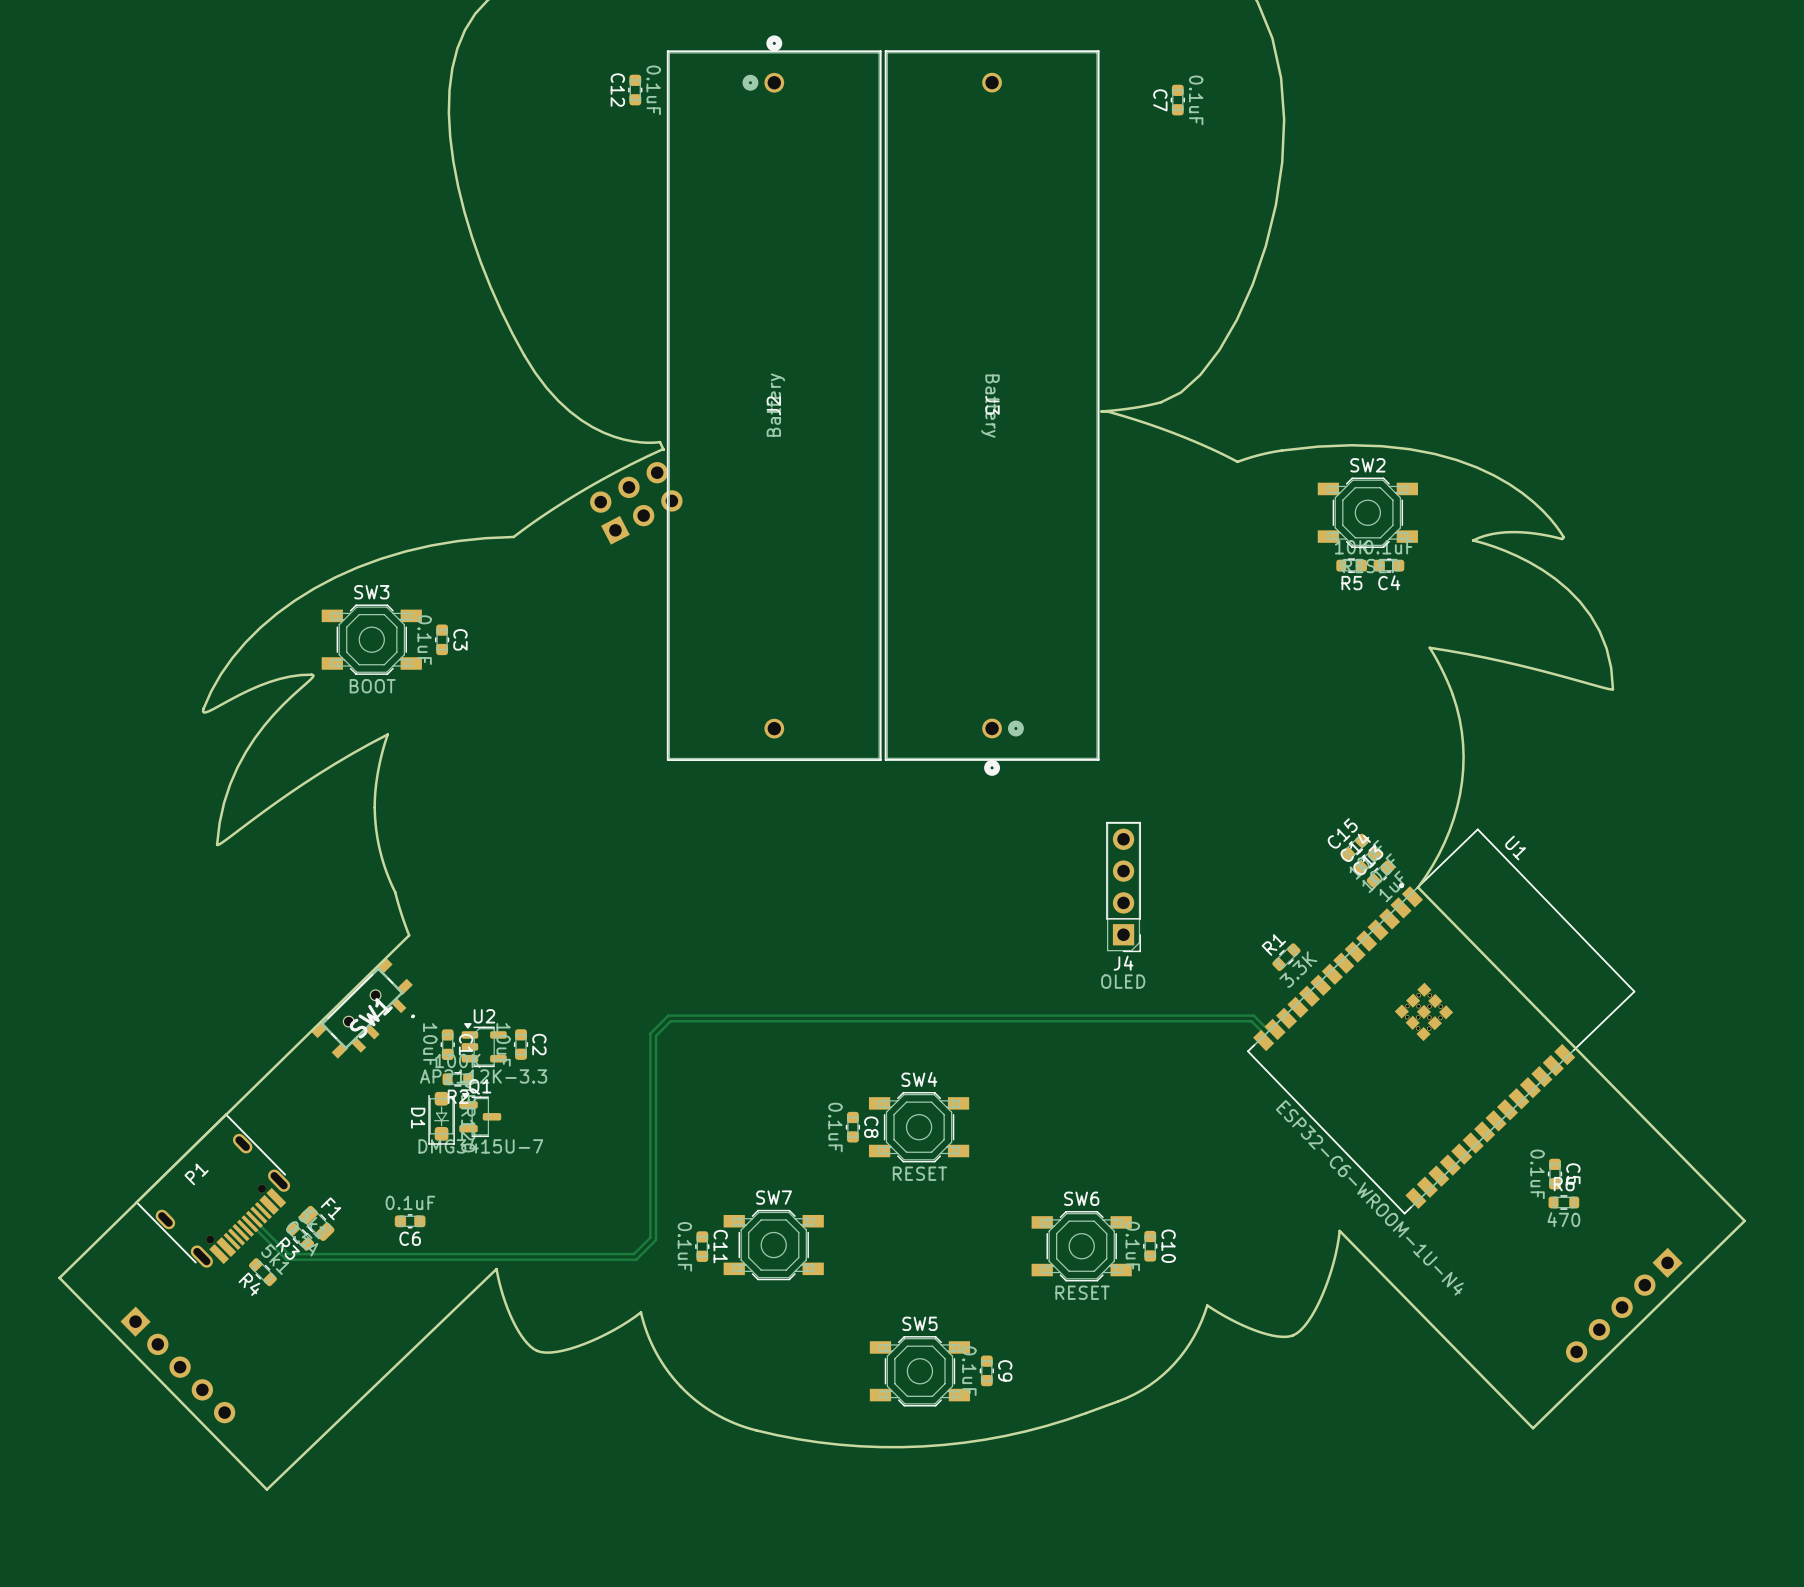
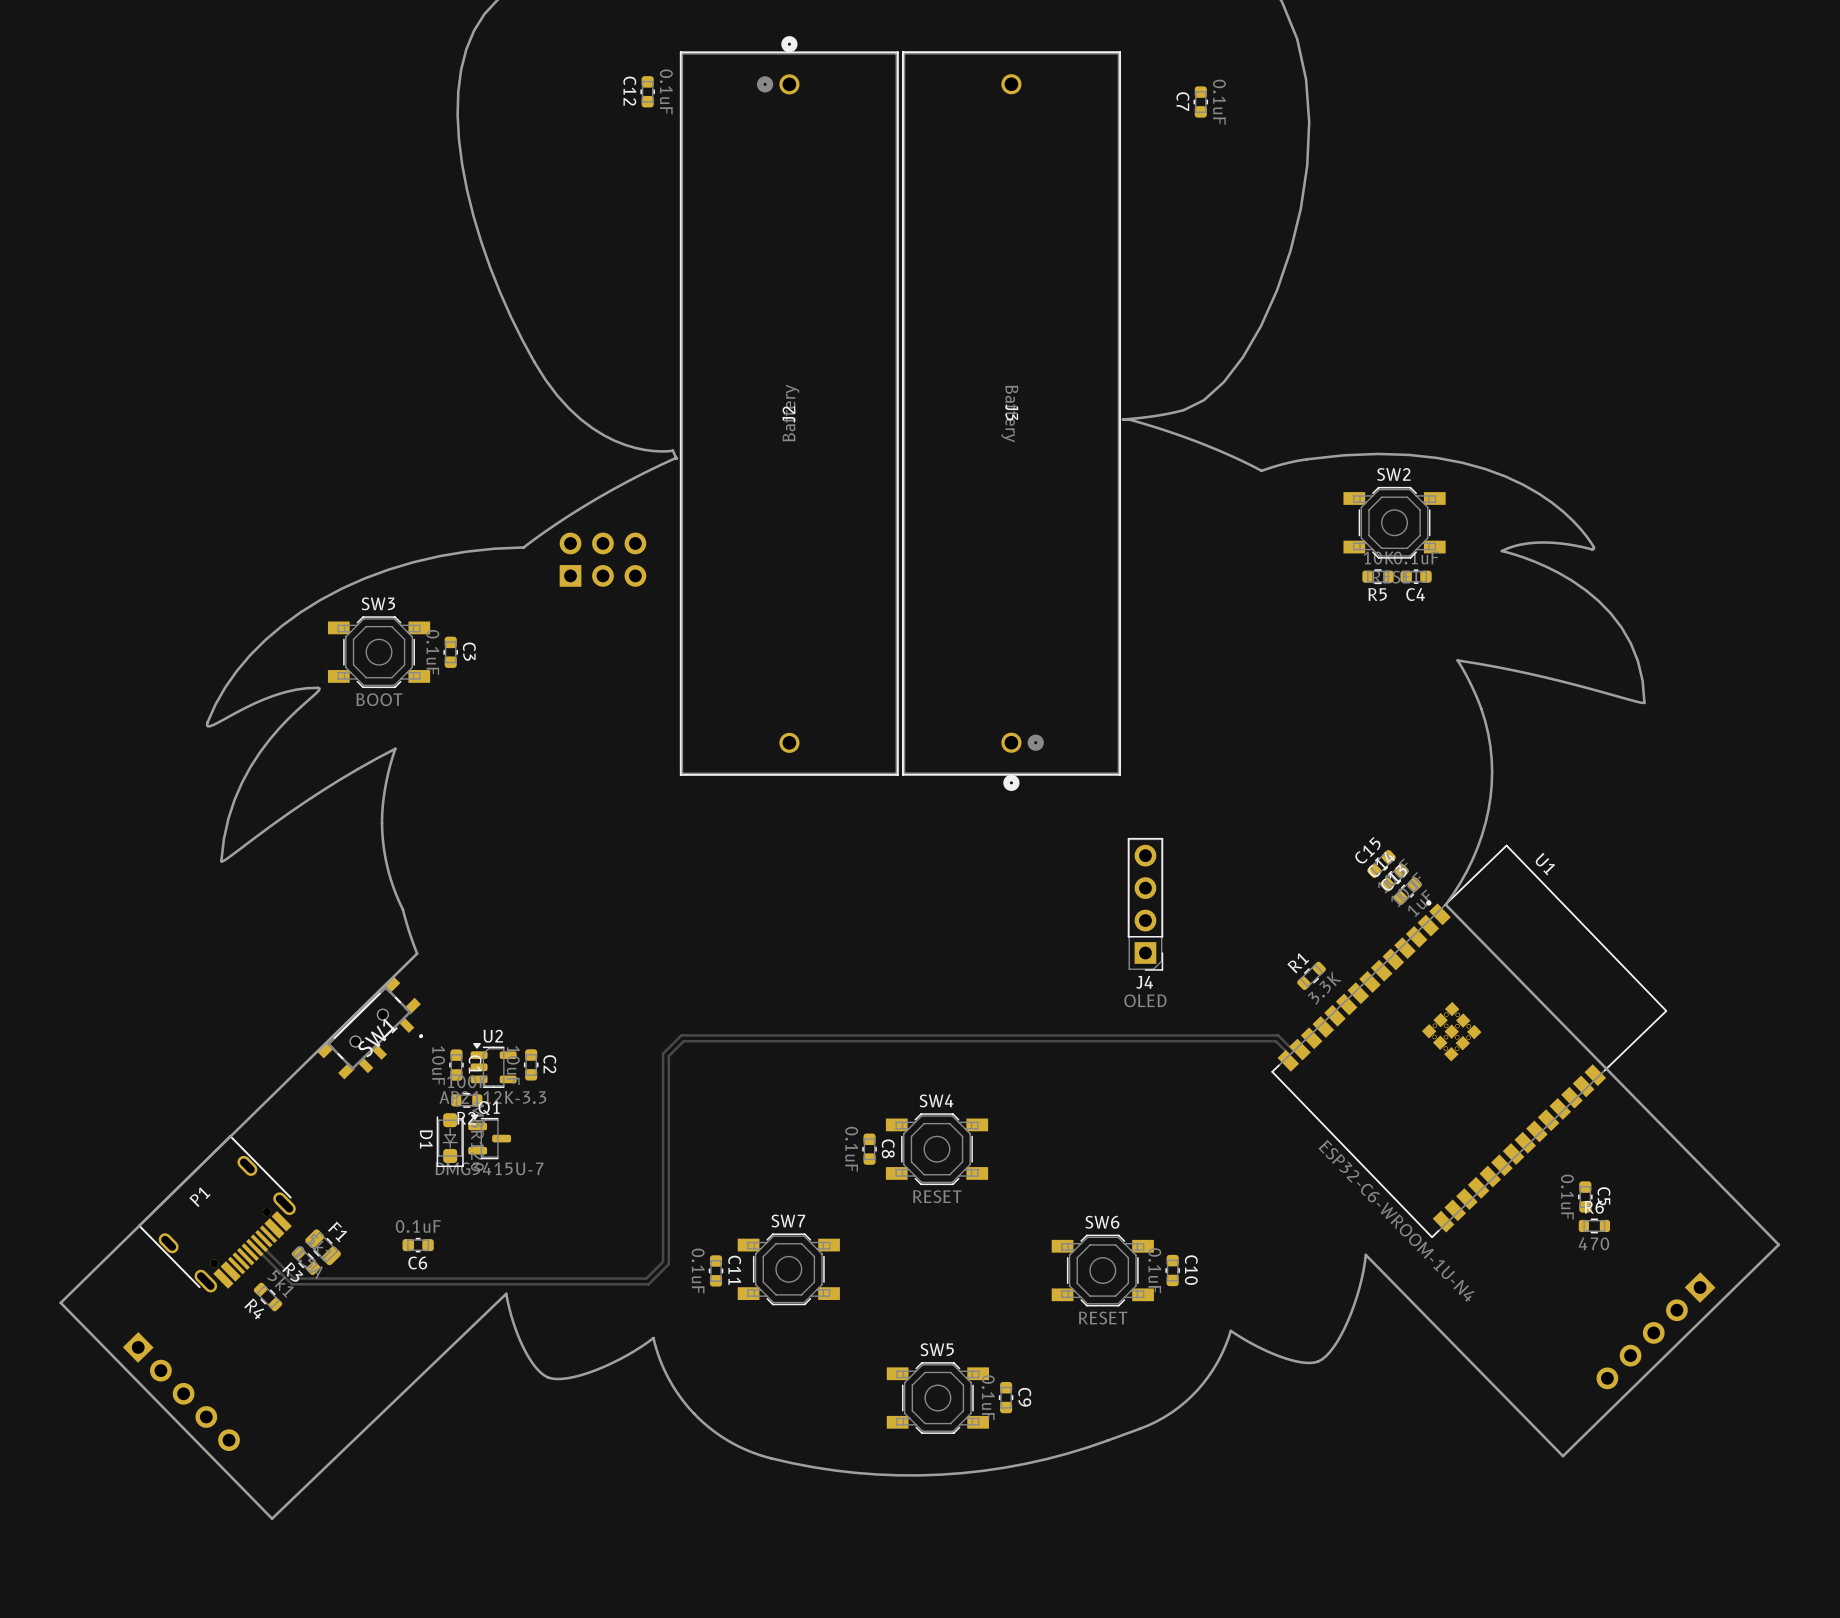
part: (636, 503) -> none
part: none -> (602, 559)

